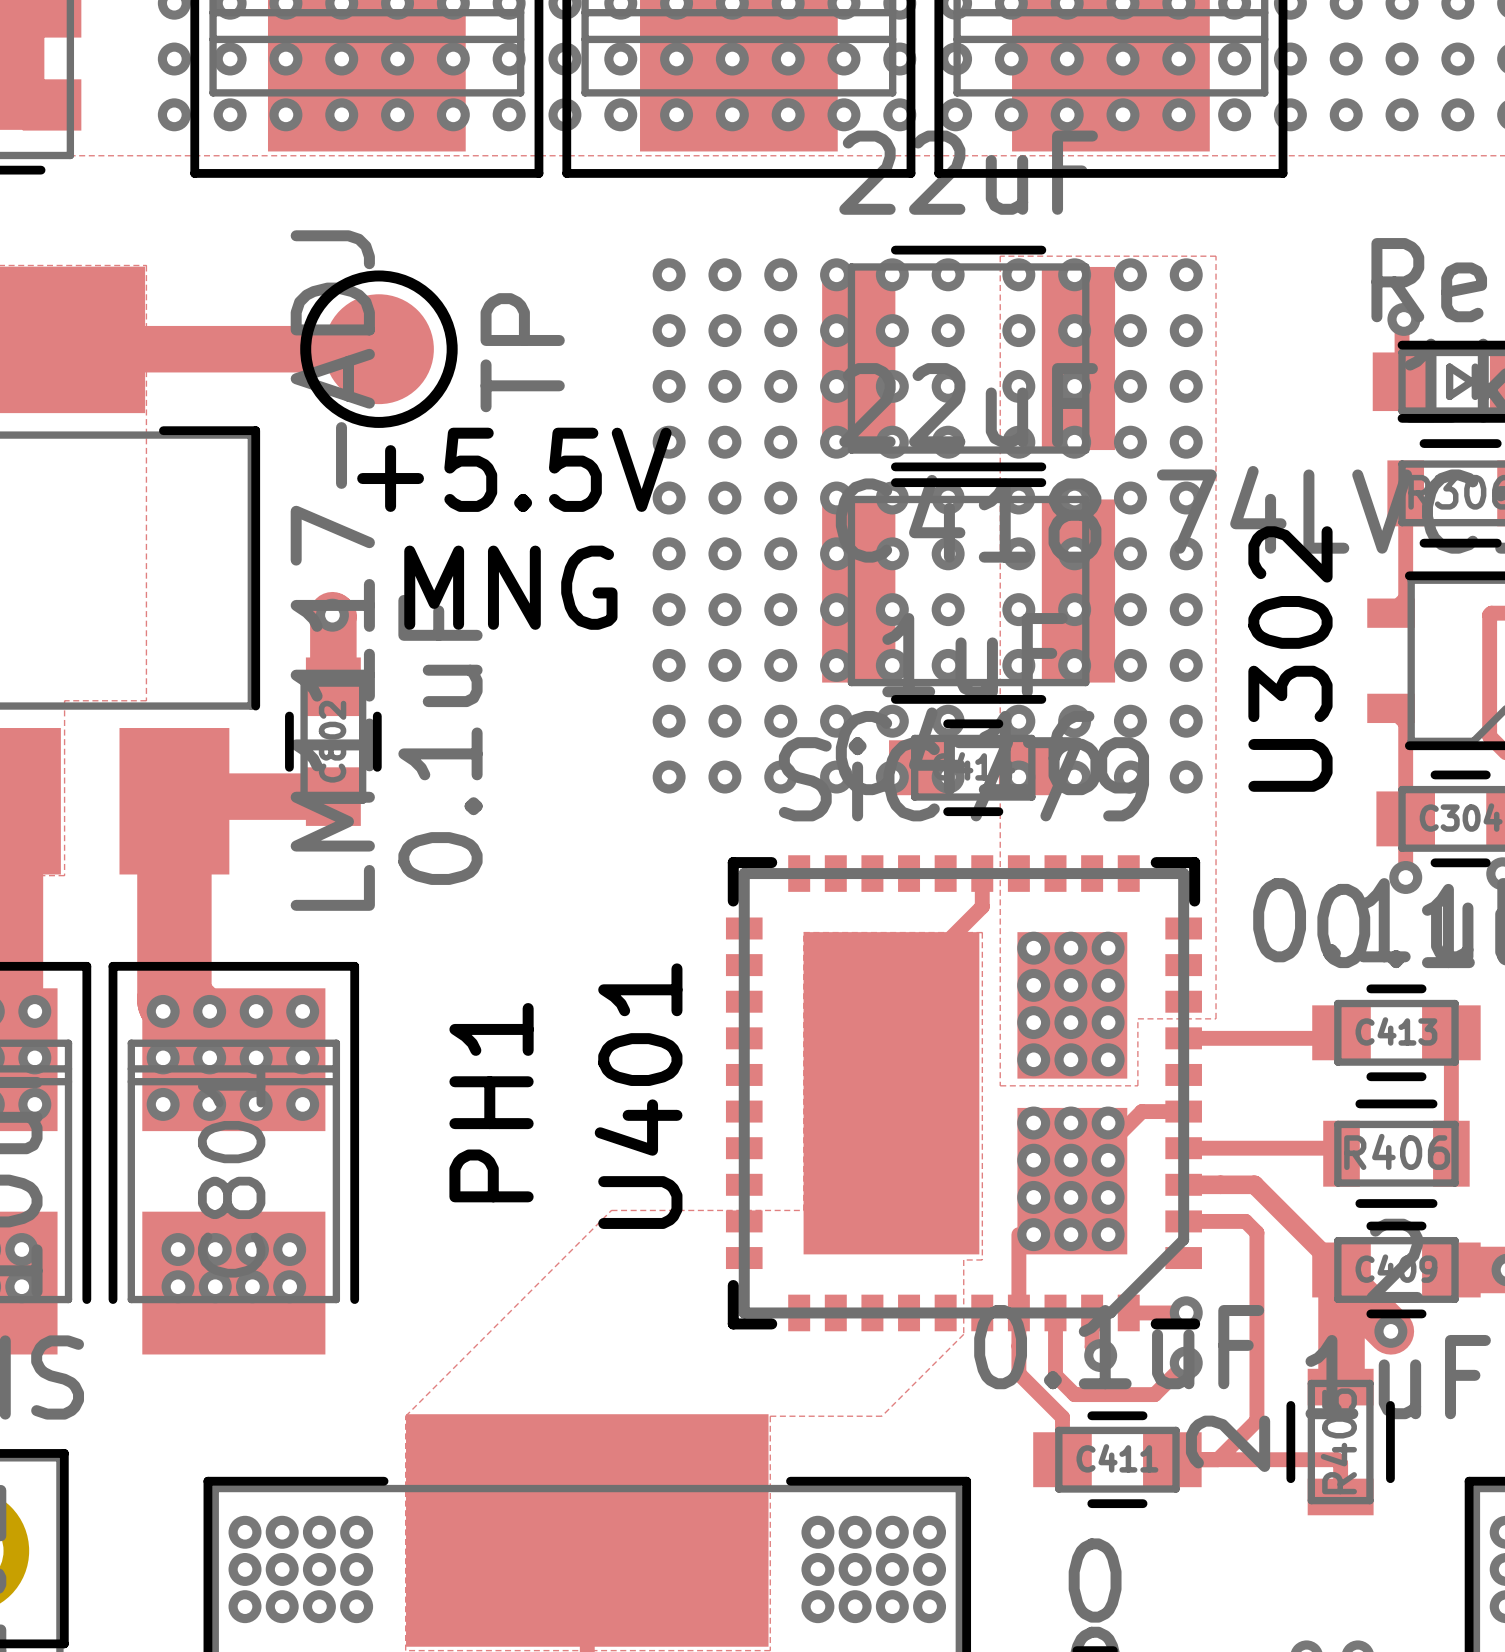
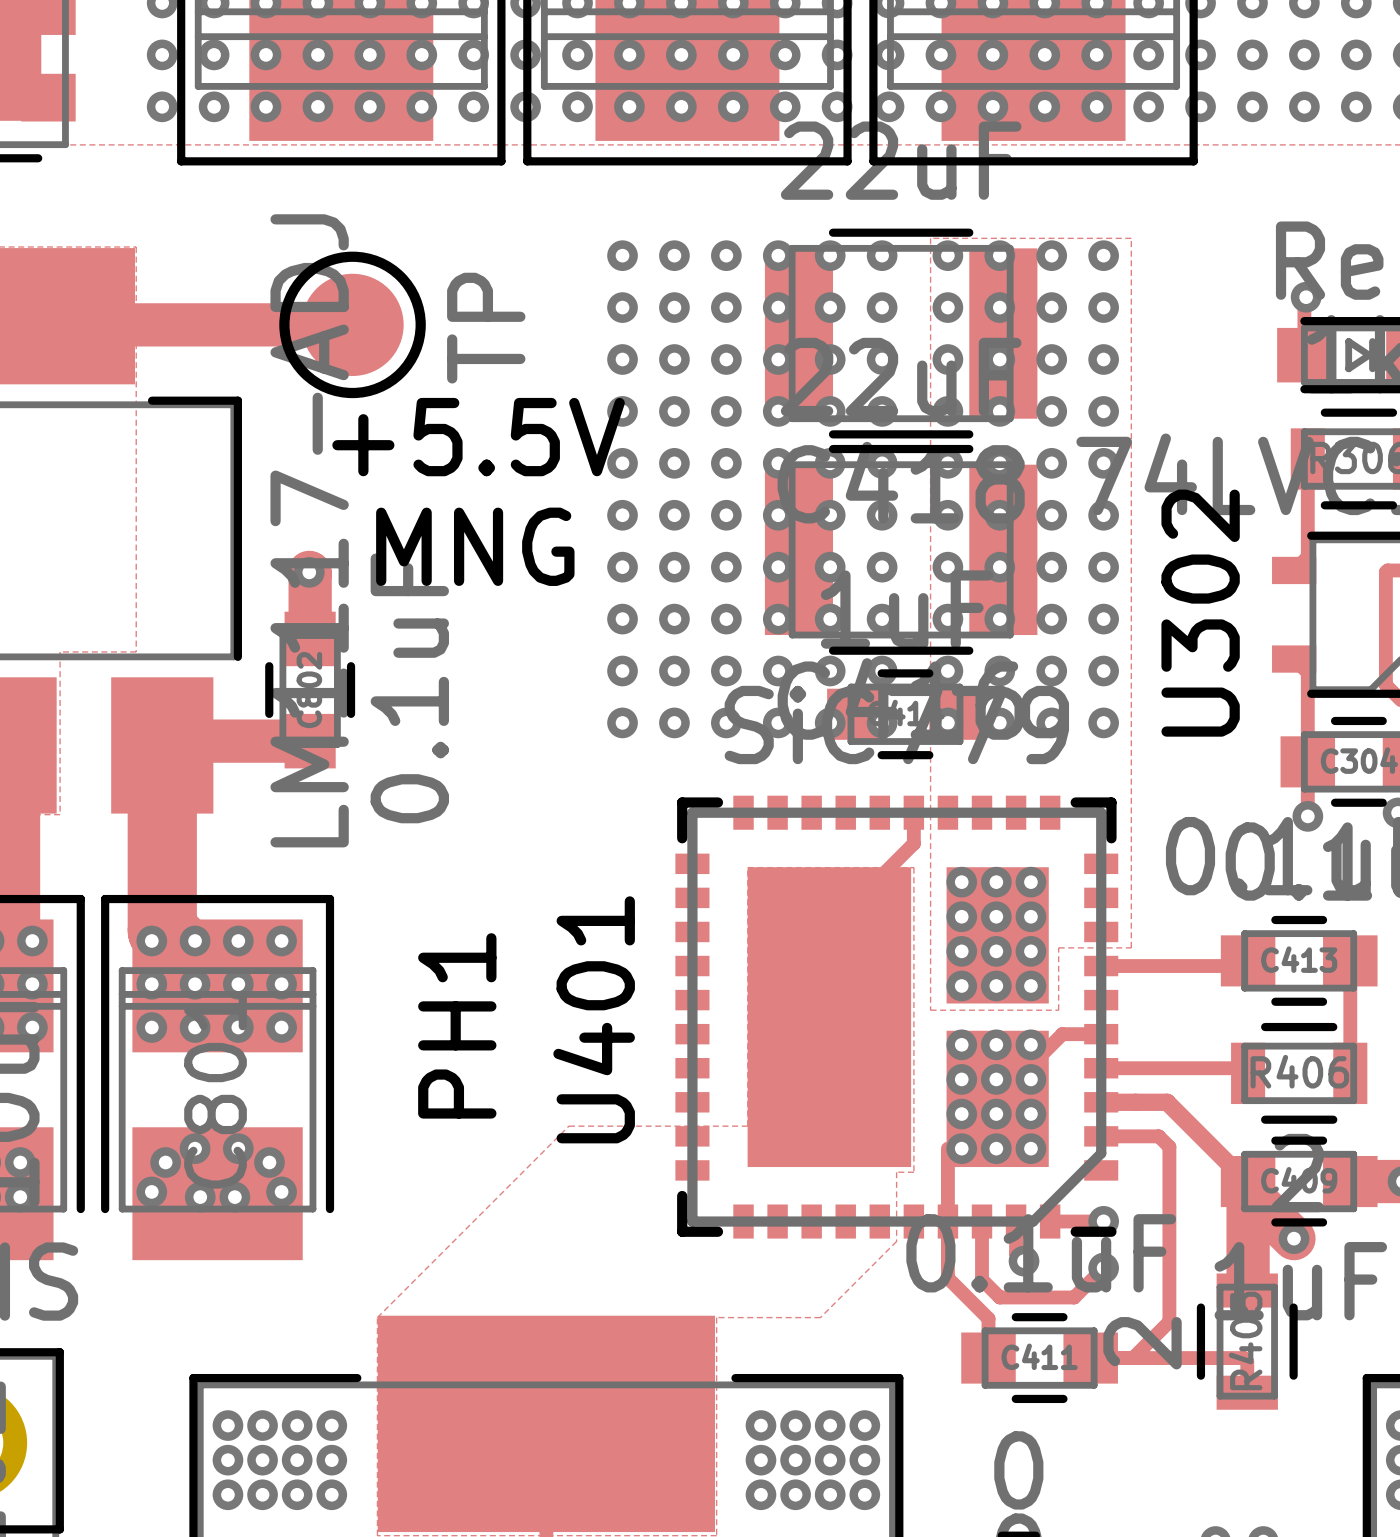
via position: (215, 1249) -> (195, 1148)
via position: (252, 1249) -> (238, 1148)
via position: (178, 1286) -> (151, 1191)
via position: (289, 1286) -> (281, 1191)

